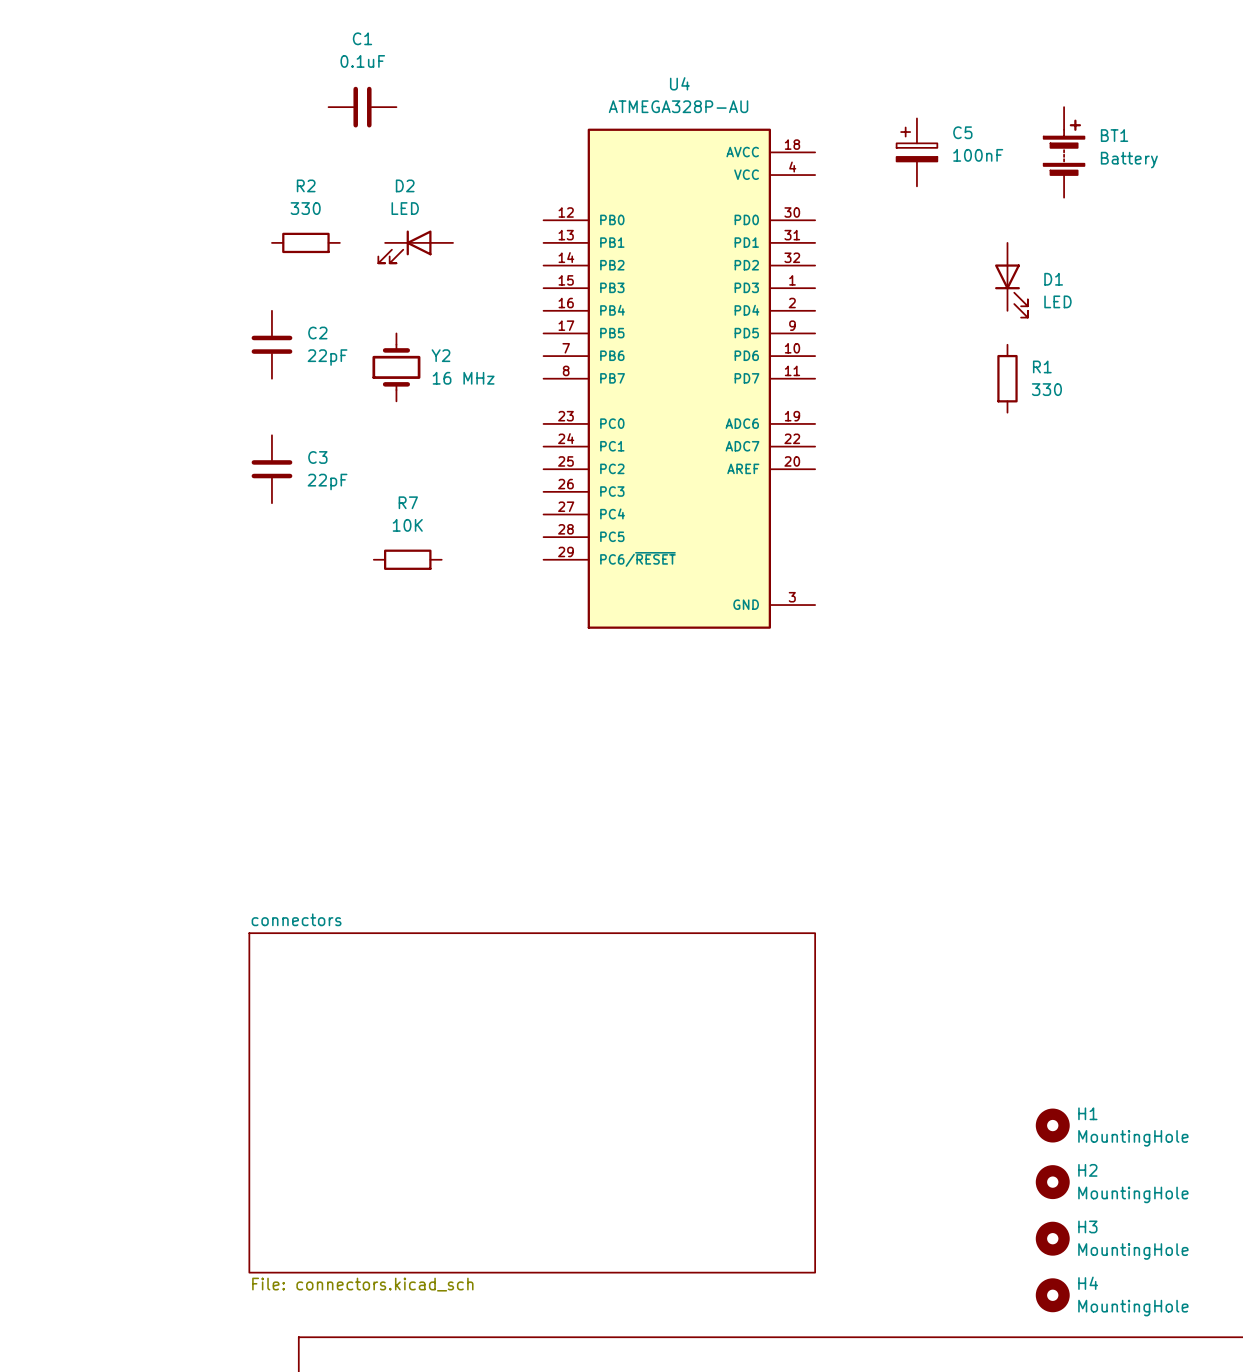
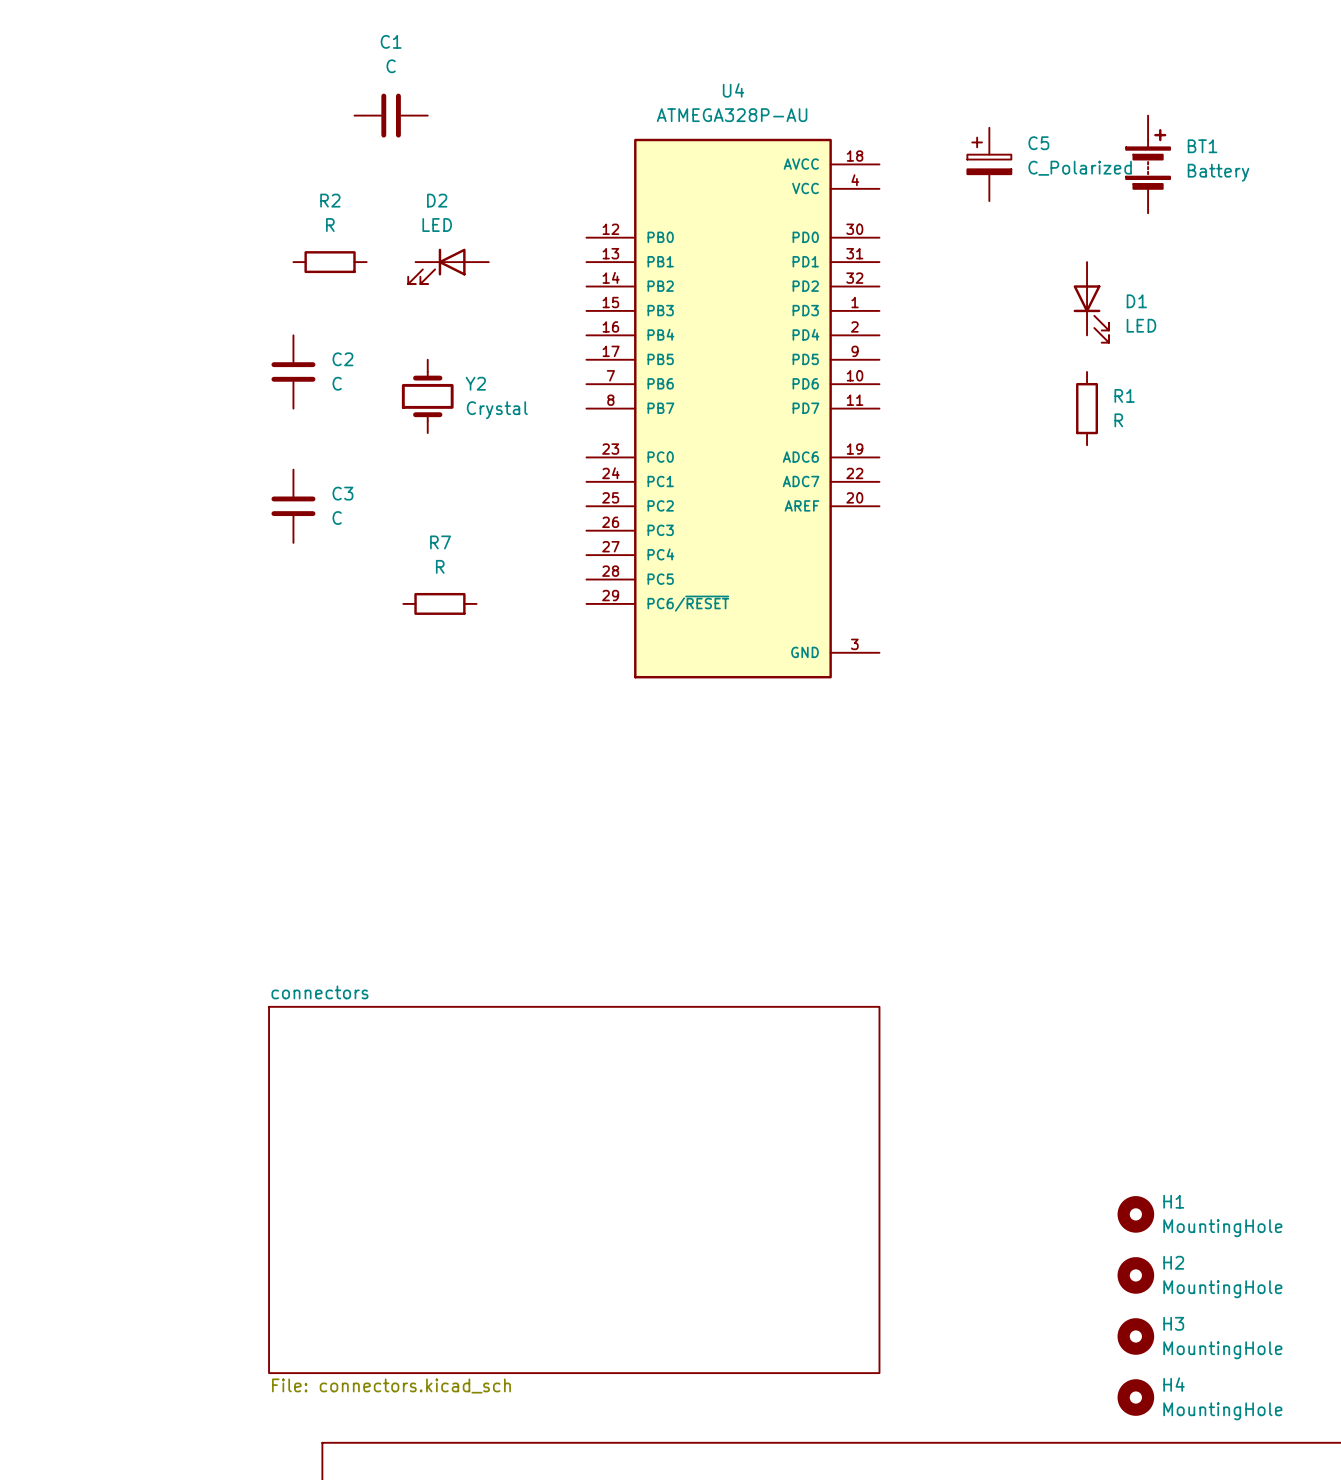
C1 value: 0.1uF (362, 61) -> C (391, 66)
C5 value: 100nF (978, 155) -> C_Polarized (1080, 168)
R2 value: 330 (305, 208) -> R (330, 225)
C2 value: 22pF (327, 357) -> C (337, 383)
Y2 value: 16 MHz (463, 378) -> Crystal (497, 410)
R1 value: 330 (1046, 389) -> R (1118, 420)
C3 value: 22pF (327, 482) -> C (337, 518)
R7 value: 10K (407, 525) -> R (440, 566)

